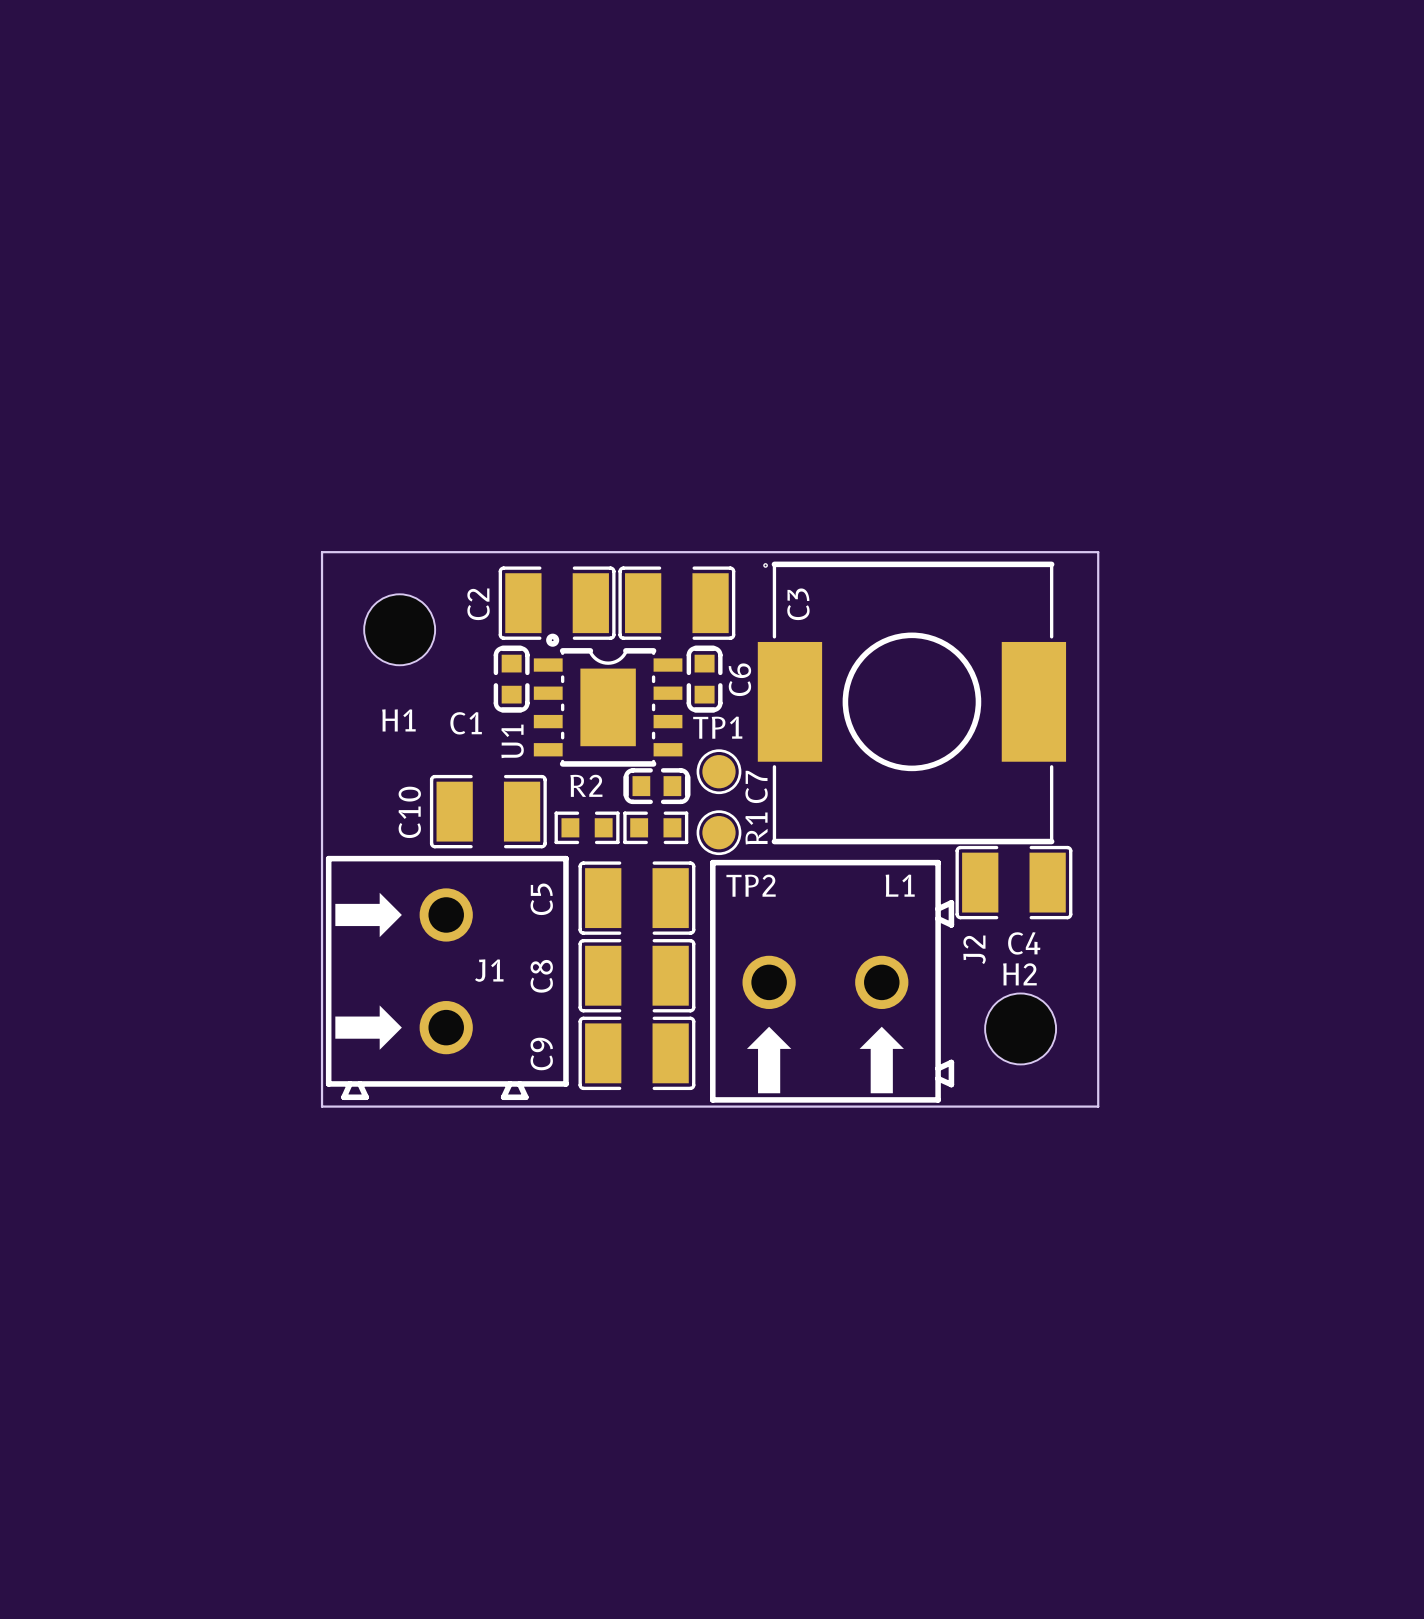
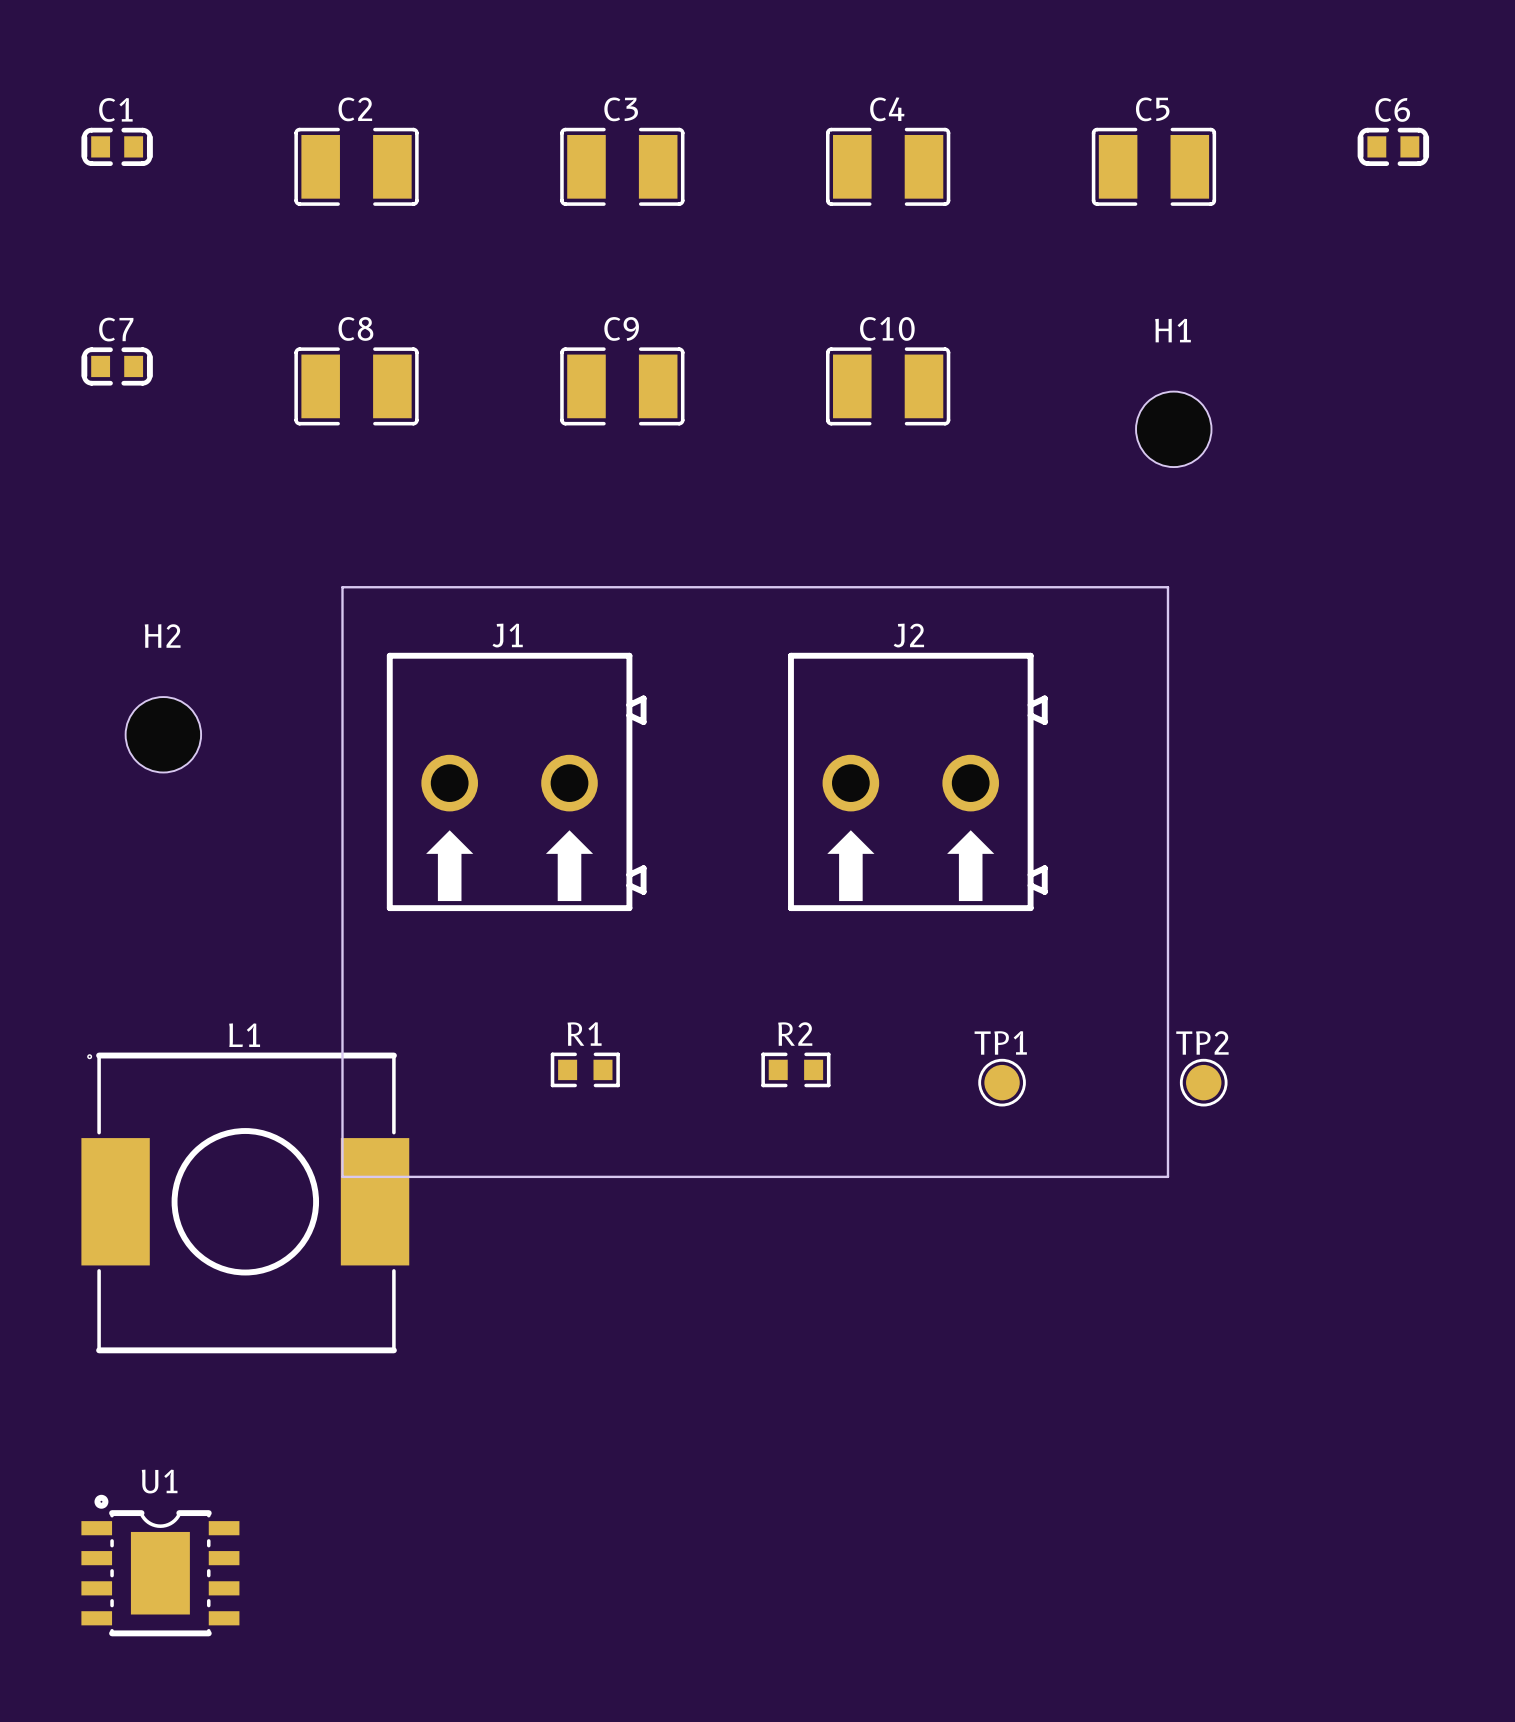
C2 position: (557, 603) -> (356, 166)
C3 position: (676, 603) -> (622, 166)
C2 name rotation: 0° (478, 604) -> 90° clockwise (355, 109)
C2 name position: C2 (478, 604) -> C2 (355, 109)
C3 name rotation: 0° (798, 604) -> 90° clockwise (621, 109)
C3 name position: C3 (798, 604) -> C3 (621, 109)
H1 position: (399, 629) -> (1173, 429)
C1 rotation: 0° (511, 679) -> 90° clockwise (117, 146)
C1 position: (511, 679) -> (117, 146)
C6 rotation: 0° (704, 679) -> 90° clockwise (1393, 146)
C6 position: (704, 679) -> (1393, 146)
C6 name position: C6 (739, 679) -> C6 (1392, 109)
U1 position: (608, 700) -> (160, 1565)
L1 position: (911, 702) -> (245, 1202)
H1 name position: H1 (398, 720) -> H1 (1173, 330)
C1 name position: C1 (466, 723) -> C1 (115, 109)
TP1 name position: TP1 (717, 727) -> TP1 (1000, 1042)
U1 name rotation: 0° (512, 741) -> 90° clockwise (159, 1481)
U1 name position: U1 (512, 741) -> U1 (159, 1481)
TP1 position: (718, 771) -> (1002, 1082)
R2 name position: R2 (586, 785) -> R2 (795, 1034)
C7 position: (656, 786) -> (117, 366)
C7 name rotation: 0° (756, 786) -> 90° clockwise (116, 329)
C7 name position: C7 (756, 786) -> C7 (116, 329)
C10 position: (488, 811) -> (888, 386)
C10 name rotation: 0° (409, 812) -> 90° clockwise (887, 328)
C10 name position: C10 (409, 812) -> C10 (887, 328)
R2 position: (587, 827) -> (795, 1069)
R1 position: (655, 827) -> (585, 1069)
R1 name rotation: 0° (756, 828) -> 90° clockwise (584, 1034)
R1 name position: R1 (756, 828) -> R1 (584, 1034)
TP2 position: (718, 832) -> (1203, 1082)
C4 position: (1013, 882) -> (888, 166)
TP2 name position: TP2 (751, 885) -> TP2 (1202, 1042)
L1 name position: L1 (900, 885) -> L1 (244, 1035)
C5 position: (636, 898) -> (1153, 166)
C5 name rotation: 0° (541, 899) -> 90° clockwise (1152, 109)
C5 name position: C5 (541, 899) -> C5 (1152, 109)
C4 name position: C4 (1024, 943) -> C4 (887, 109)
J2 name rotation: 0° (974, 949) -> 90° clockwise (908, 635)
J2 name position: J2 (974, 949) -> J2 (908, 635)
J1 name position: J1 (489, 970) -> J1 (507, 635)
H2 name position: H2 (1019, 974) -> H2 (162, 636)
C8 position: (636, 975) -> (356, 386)
C8 name rotation: 0° (541, 976) -> 90° clockwise (355, 328)
C8 name position: C8 (541, 976) -> C8 (355, 328)
J1 rotation: 0° (447, 977) -> 90° counterclockwise (516, 781)
J1 position: (447, 977) -> (516, 781)
J2 position: (832, 981) -> (917, 781)
H2 position: (1020, 1028) -> (163, 734)
C9 position: (636, 1053) -> (622, 386)
C9 name rotation: 0° (541, 1054) -> 90° clockwise (621, 328)
C9 name position: C9 (541, 1054) -> C9 (621, 328)

